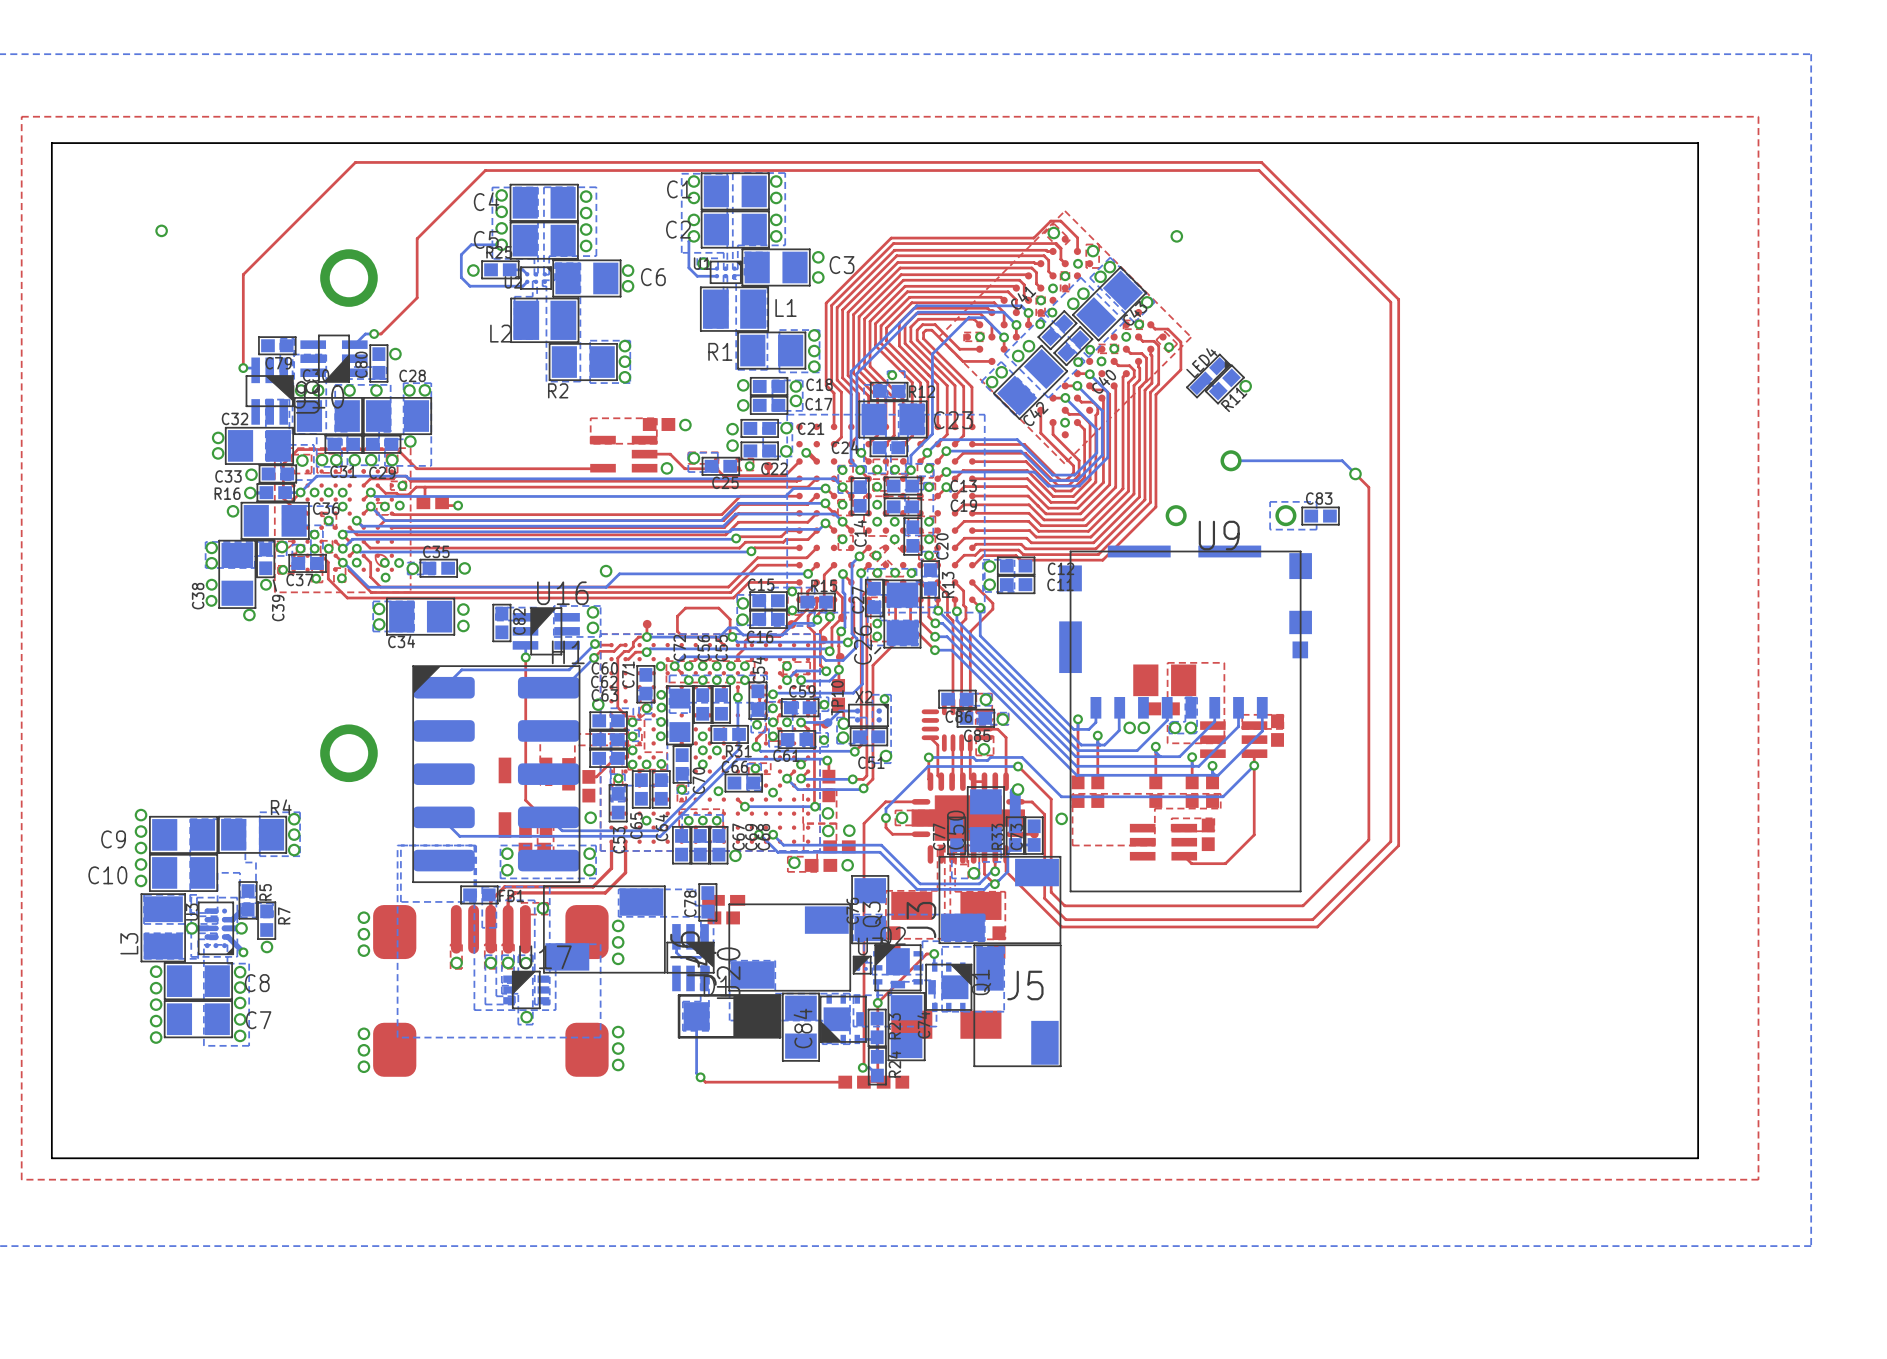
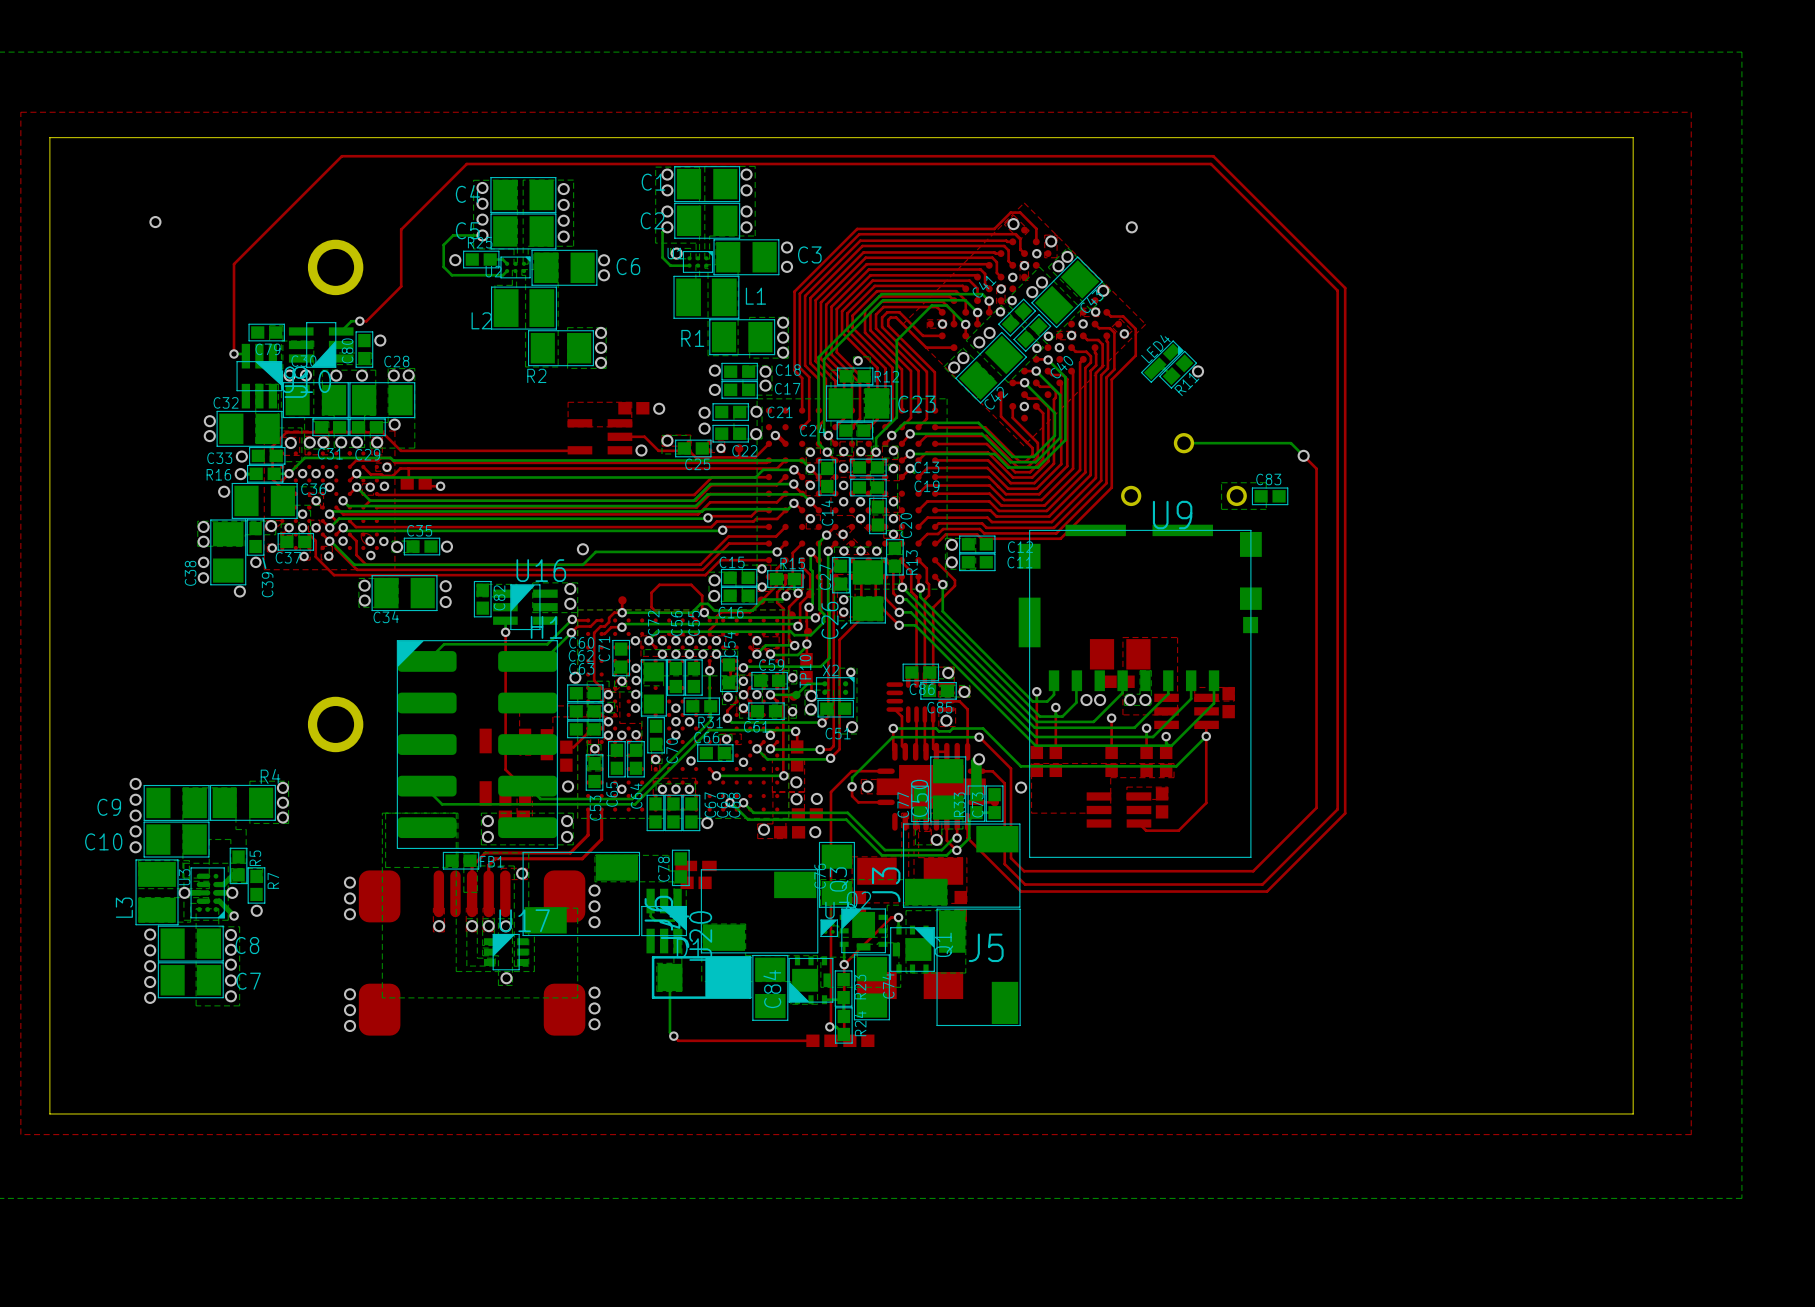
bottom track: (1155, 746) (1155, 752) (1160, 756) -> none

